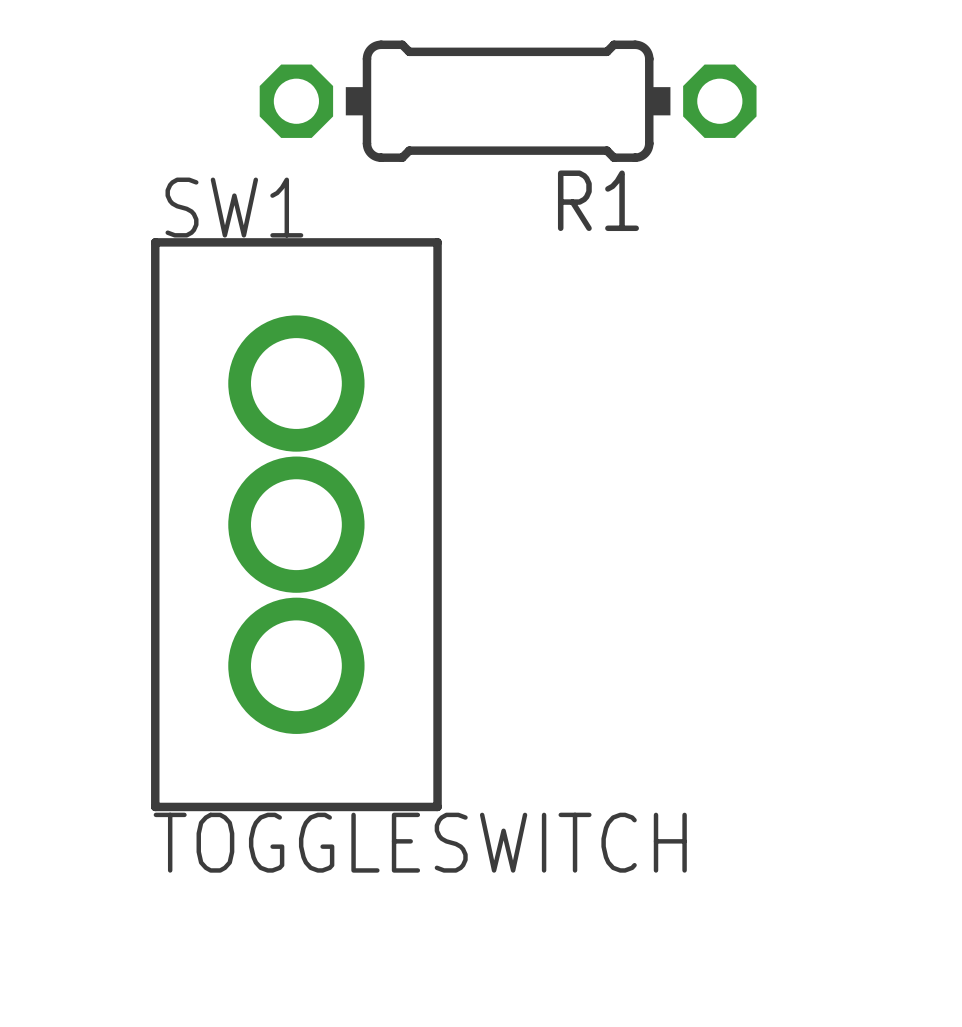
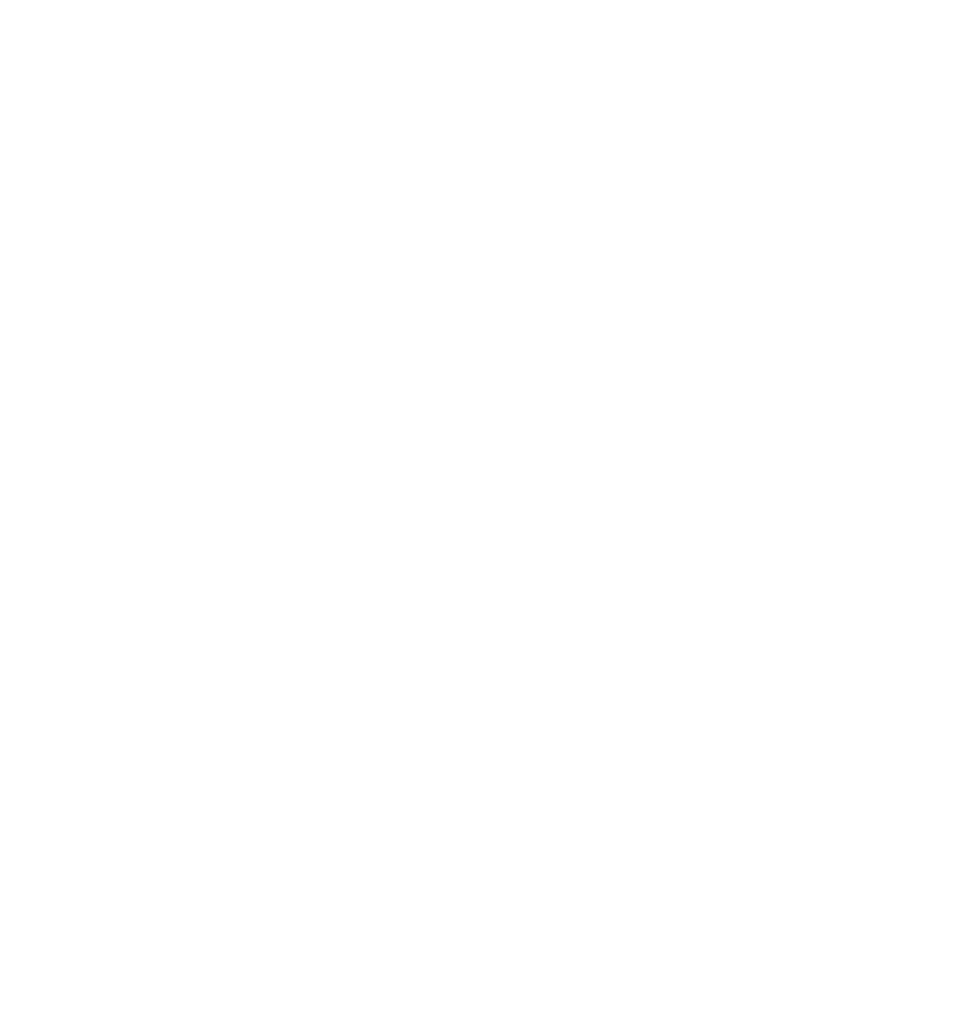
R1: (508, 101) -> none
SW1: TOGGLESWITCH (296, 524) -> none

